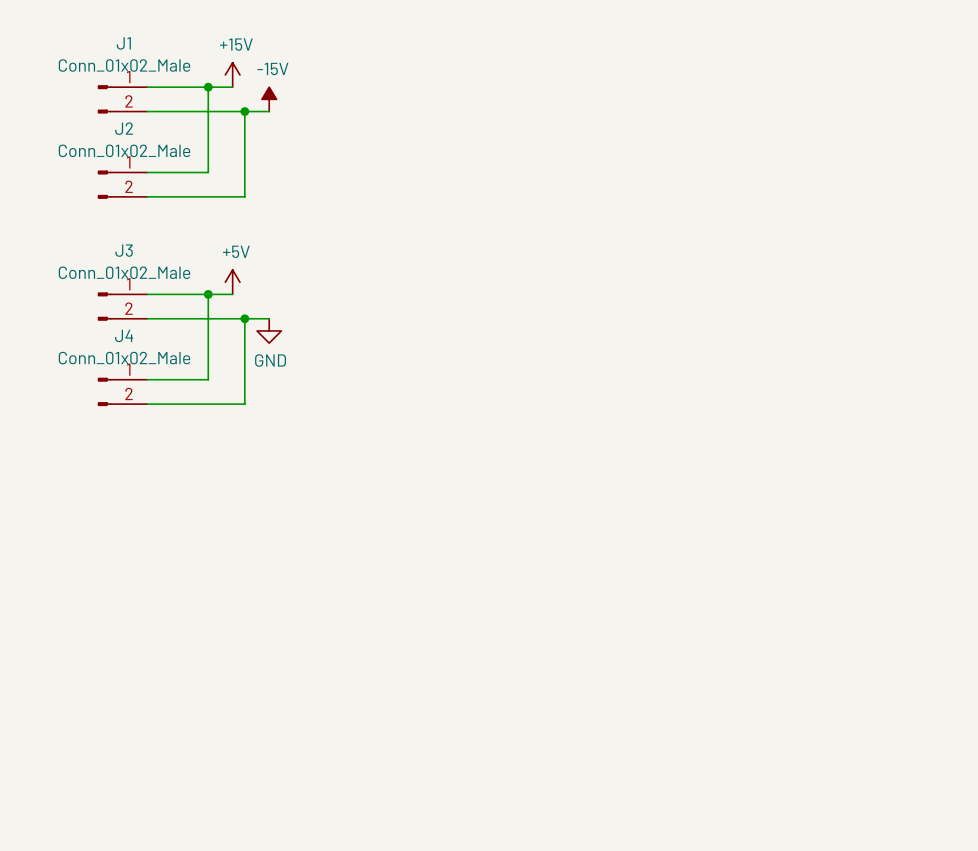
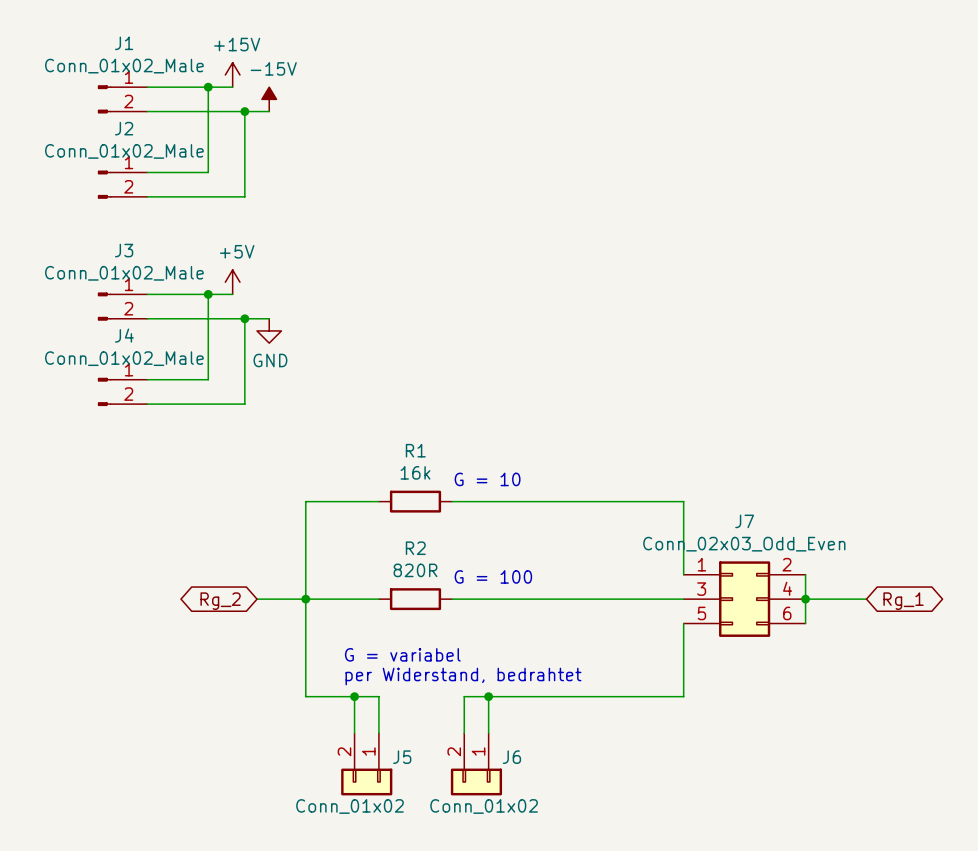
text: none -> G = 10 (487, 479)
wire: none -> (378, 501) (305, 501) (305, 696) (378, 696) (378, 733)
R1: none -> 16k (415, 501)
wire: none -> (452, 501) (683, 501) (683, 574)
wire: none -> (805, 574) (805, 623)
text: none -> G = 100 (493, 576)
wire: none -> (257, 599) (378, 599)
junction: none -> (305, 599)
R2: none -> 820R (415, 599)
wire: none -> (452, 599) (683, 599)
J7: none -> Conn_02x03_Odd_Even (744, 599)
wire: none -> (805, 599) (866, 599)
junction: none -> (805, 599)
global label: none -> Rg_2 (220, 601)
global label: none -> Rg_1 (903, 601)
wire: none -> (683, 623) (683, 696) (464, 696) (464, 733)
text: none -> G = variabel (402, 654)
text: none -> per Widerstand, bedrahtet (463, 676)
wire: none -> (354, 696) (354, 733)
junction: none -> (354, 696)
wire: none -> (488, 696) (488, 733)
junction: none -> (488, 696)
J5: none -> Conn_01x02 (366, 764)
J6: none -> Conn_01x02 (476, 764)

